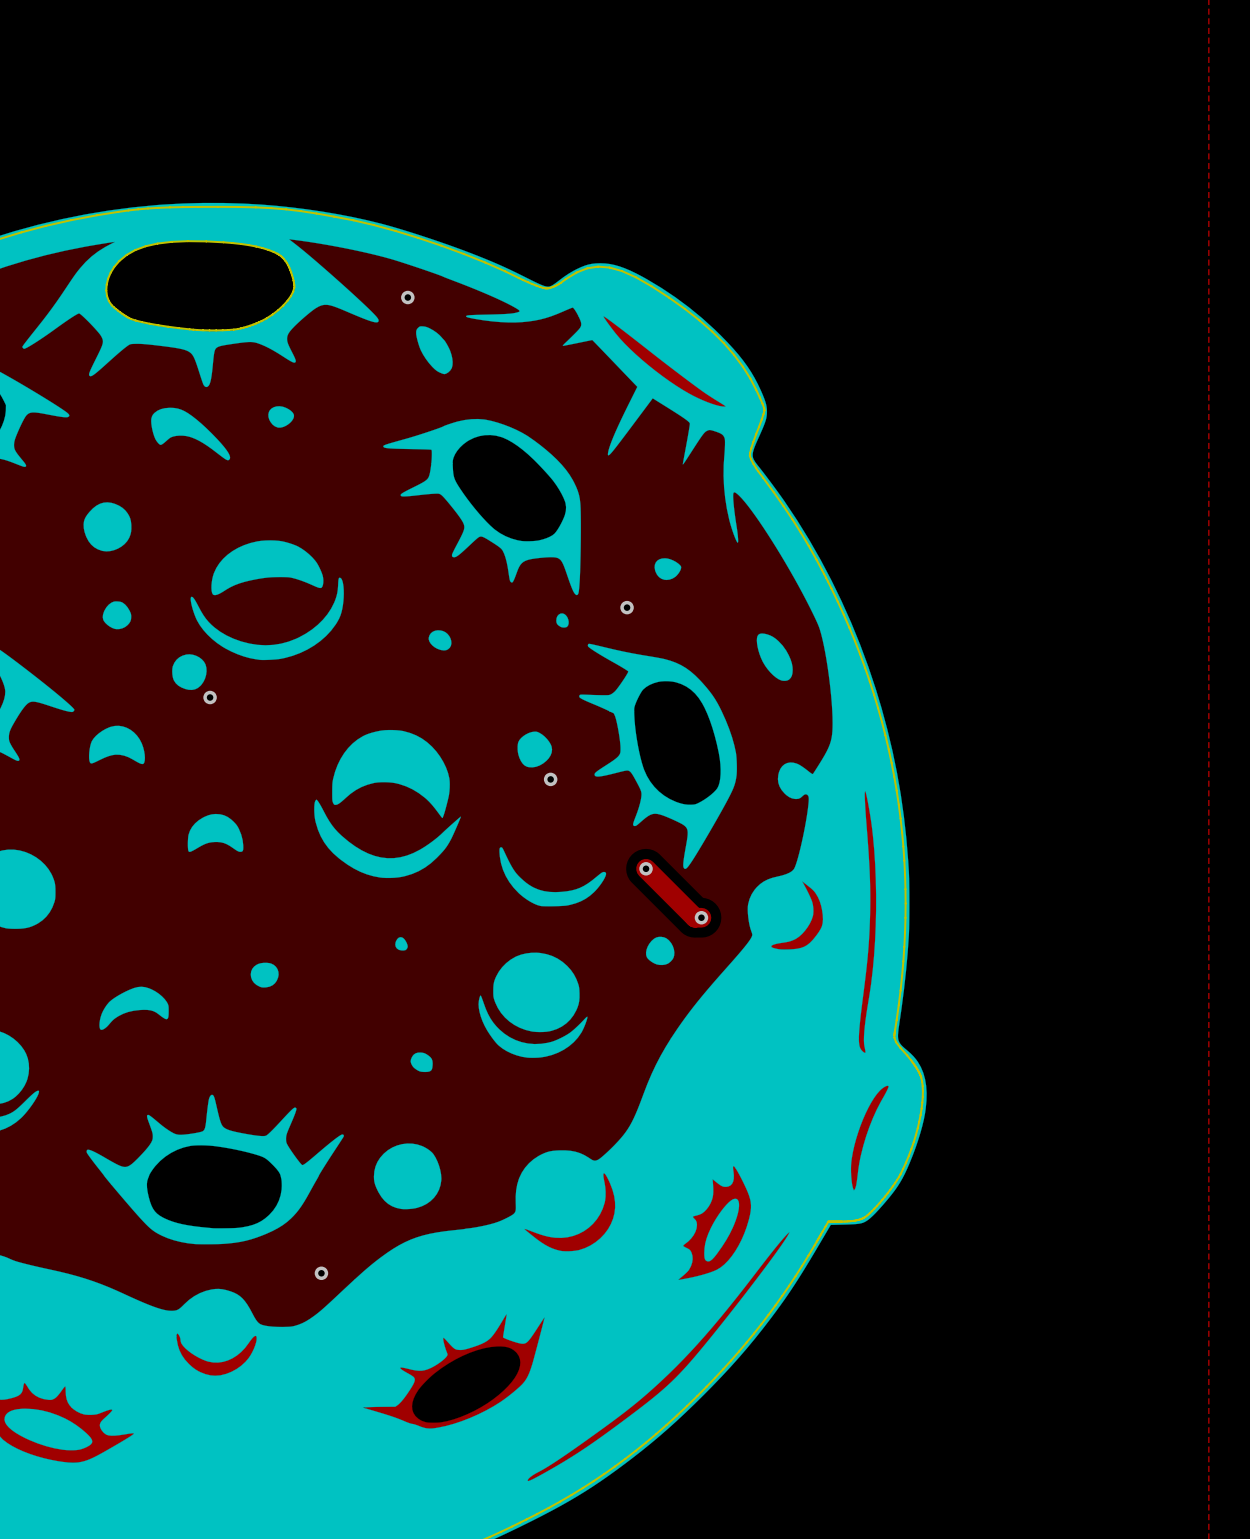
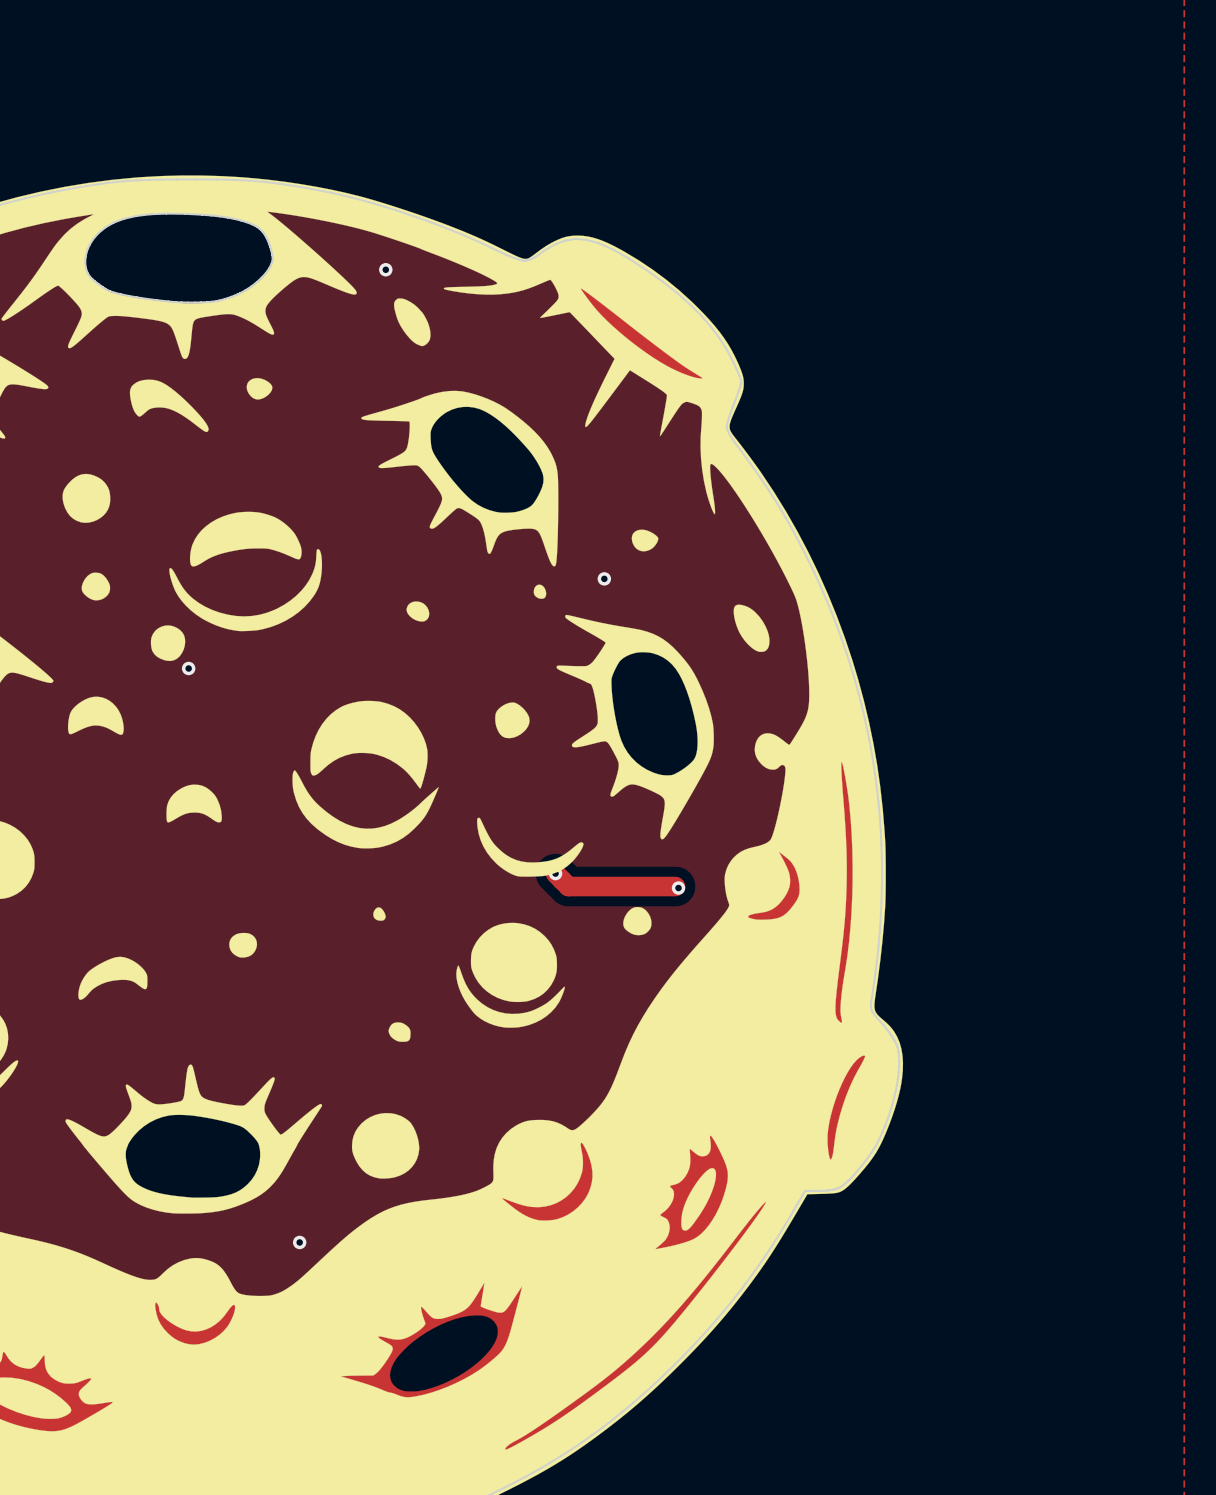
via: (550, 779) -> none
track: (646, 868) (694, 917) (701, 917) -> none
via: (646, 868) -> none
track: none -> (555, 873) (568, 886) (675, 886)
via: none -> (555, 873)

